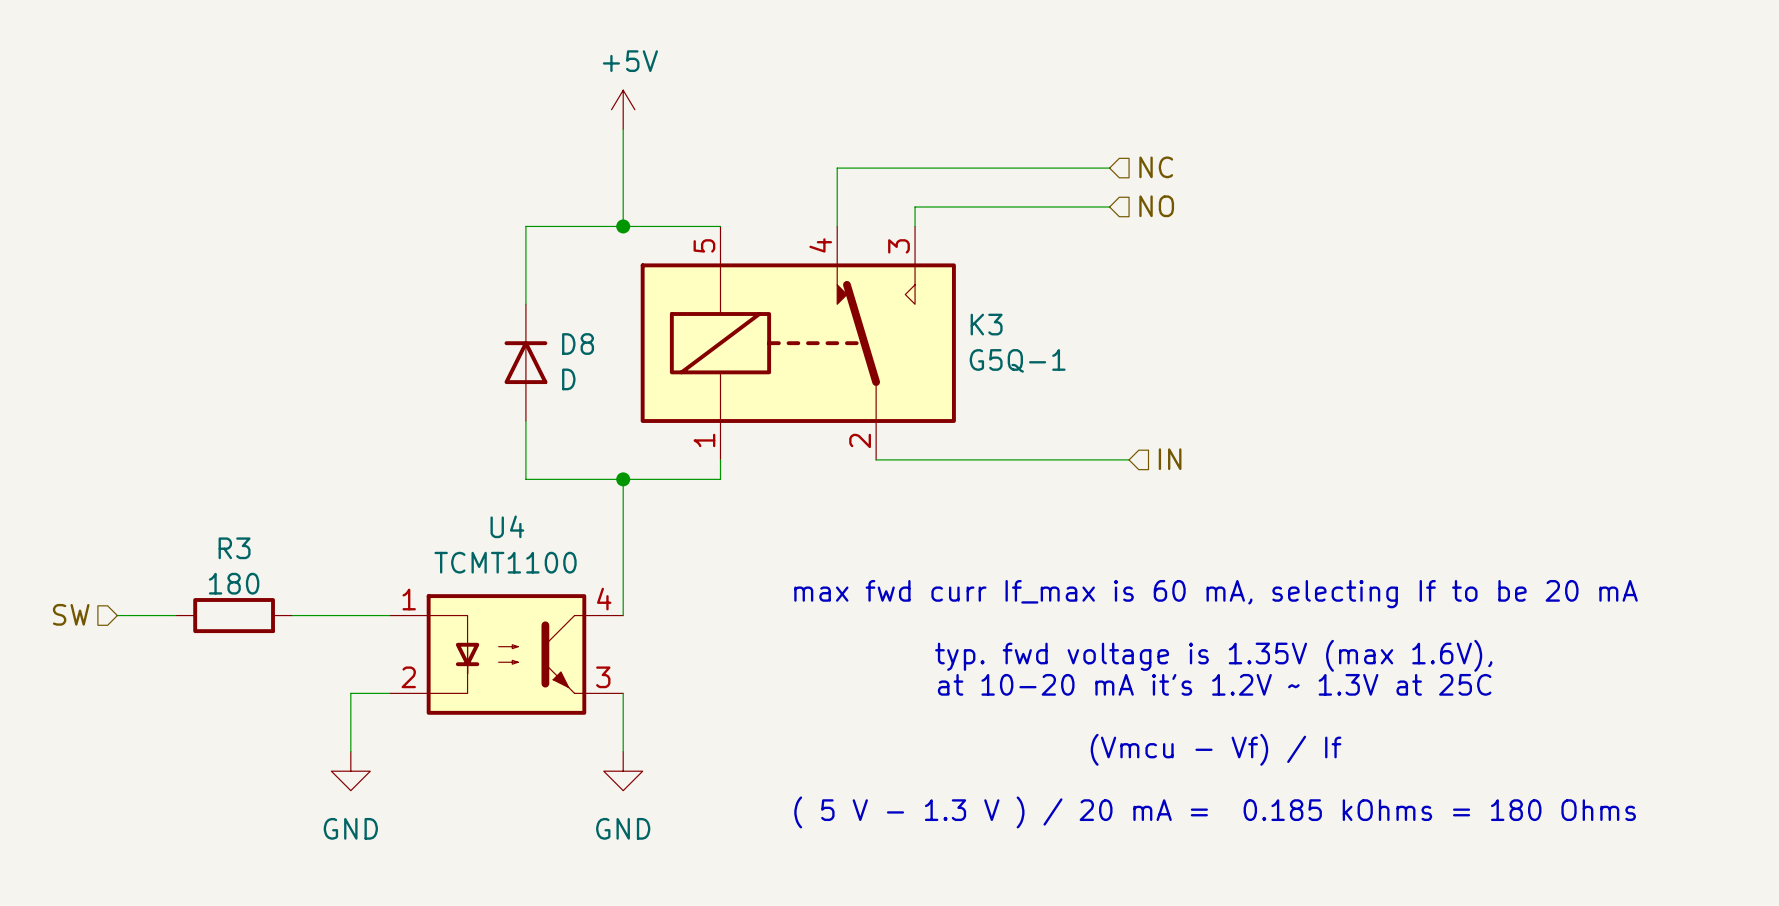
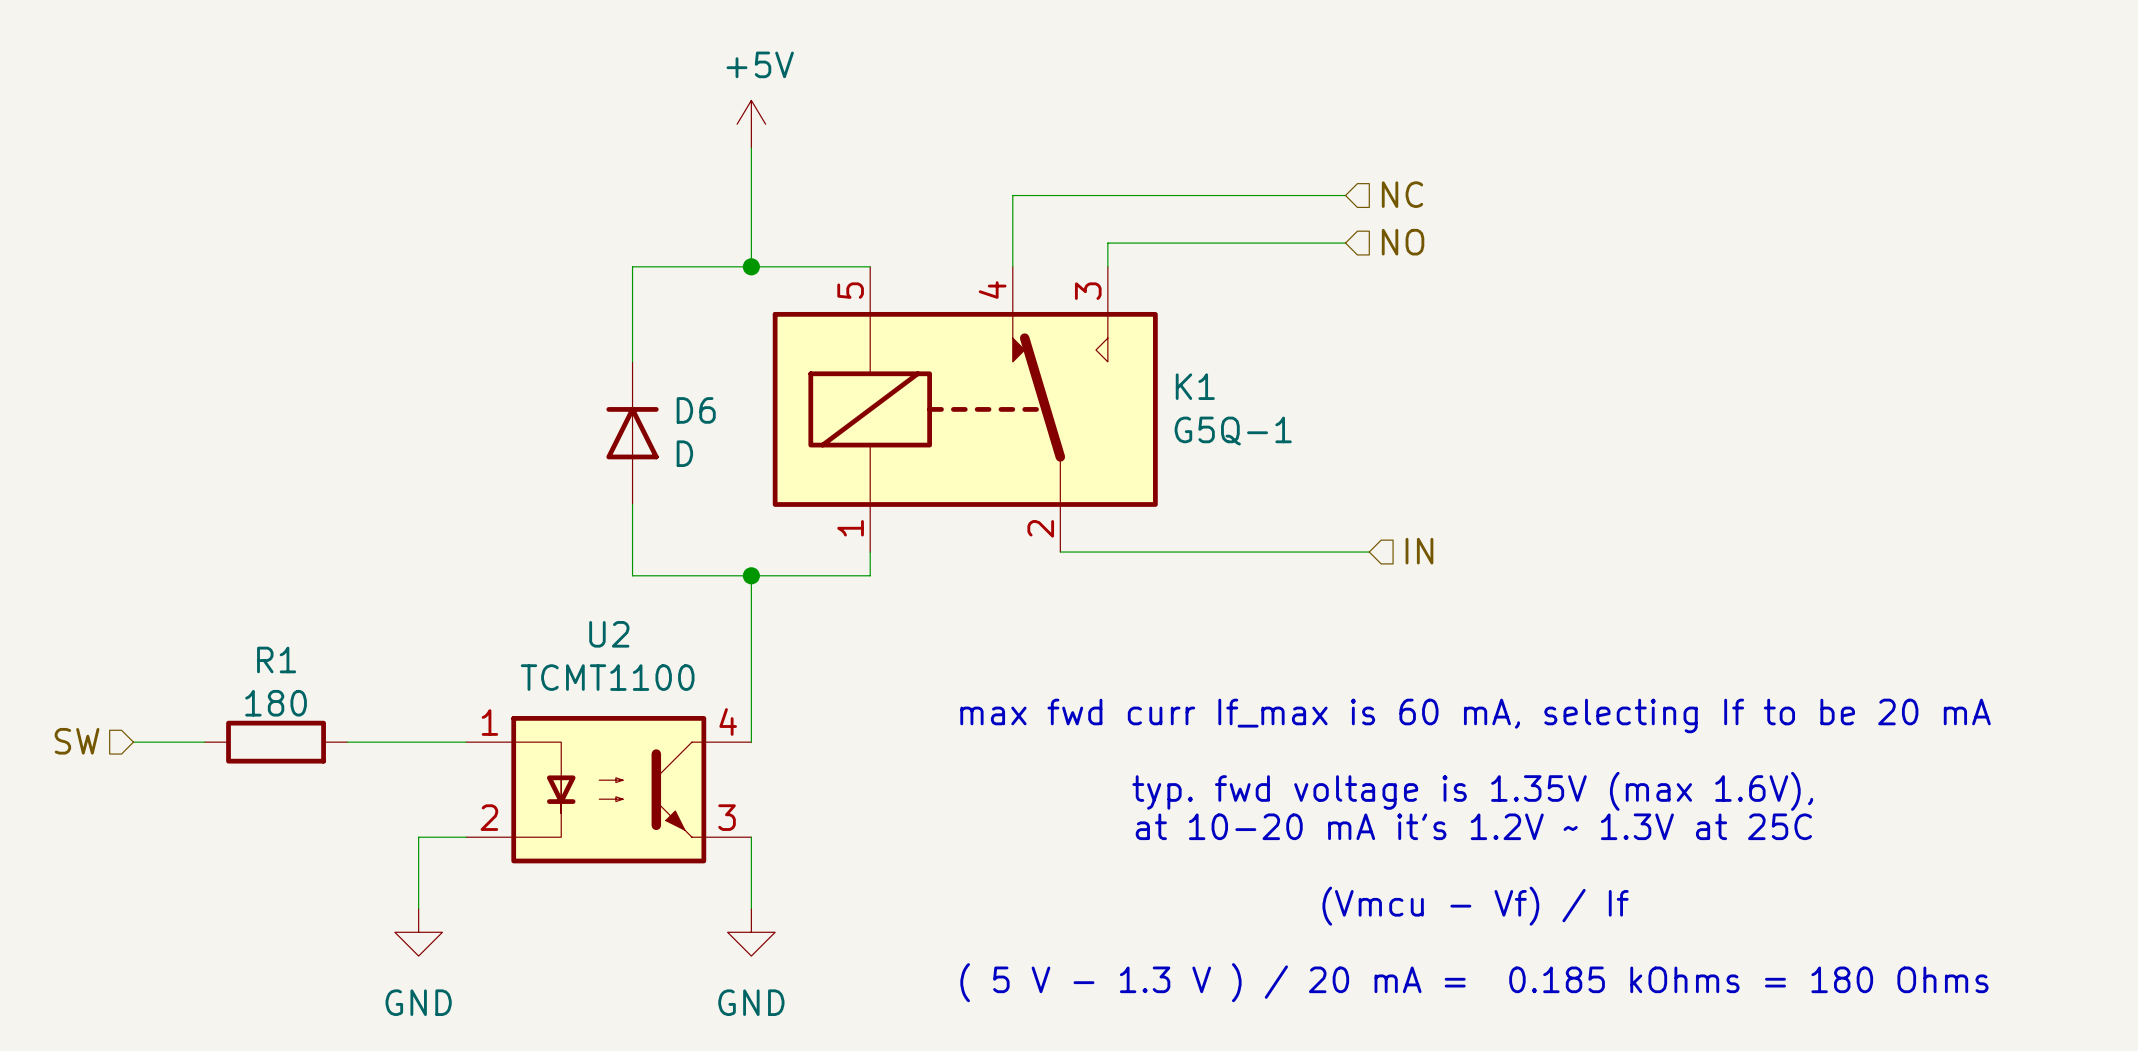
K3 name: K3 (986, 324) -> K1 (1195, 386)
D8 name: D8 (578, 344) -> D6 (696, 410)
U4 name: U4 (507, 526) -> U2 (609, 634)
R3 name: R3 (234, 548) -> R1 (276, 659)

